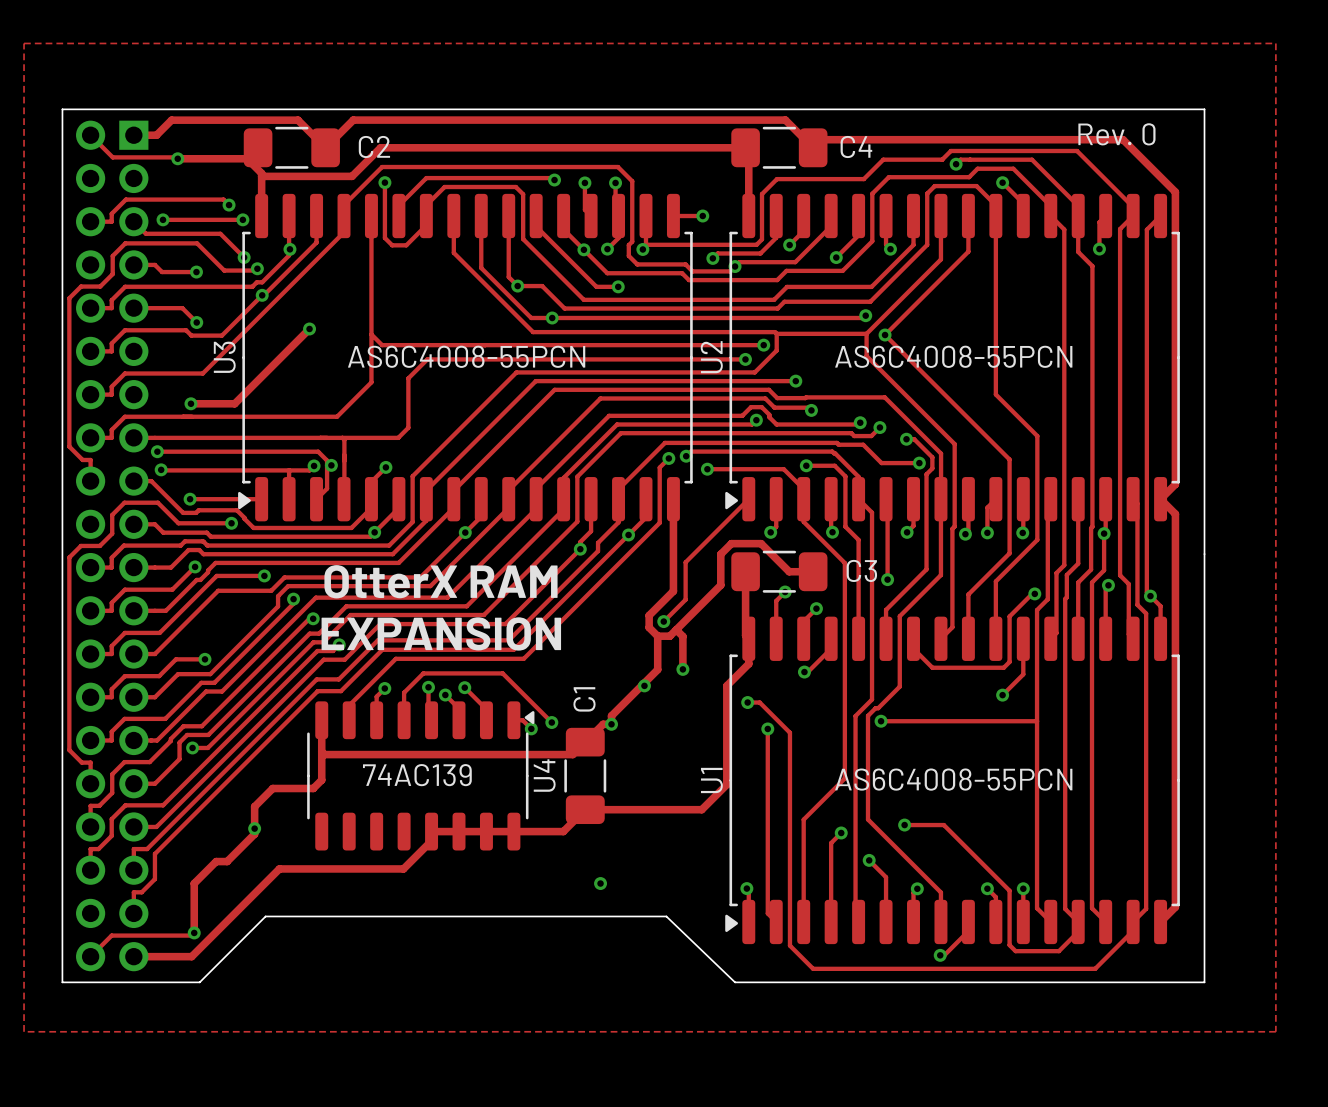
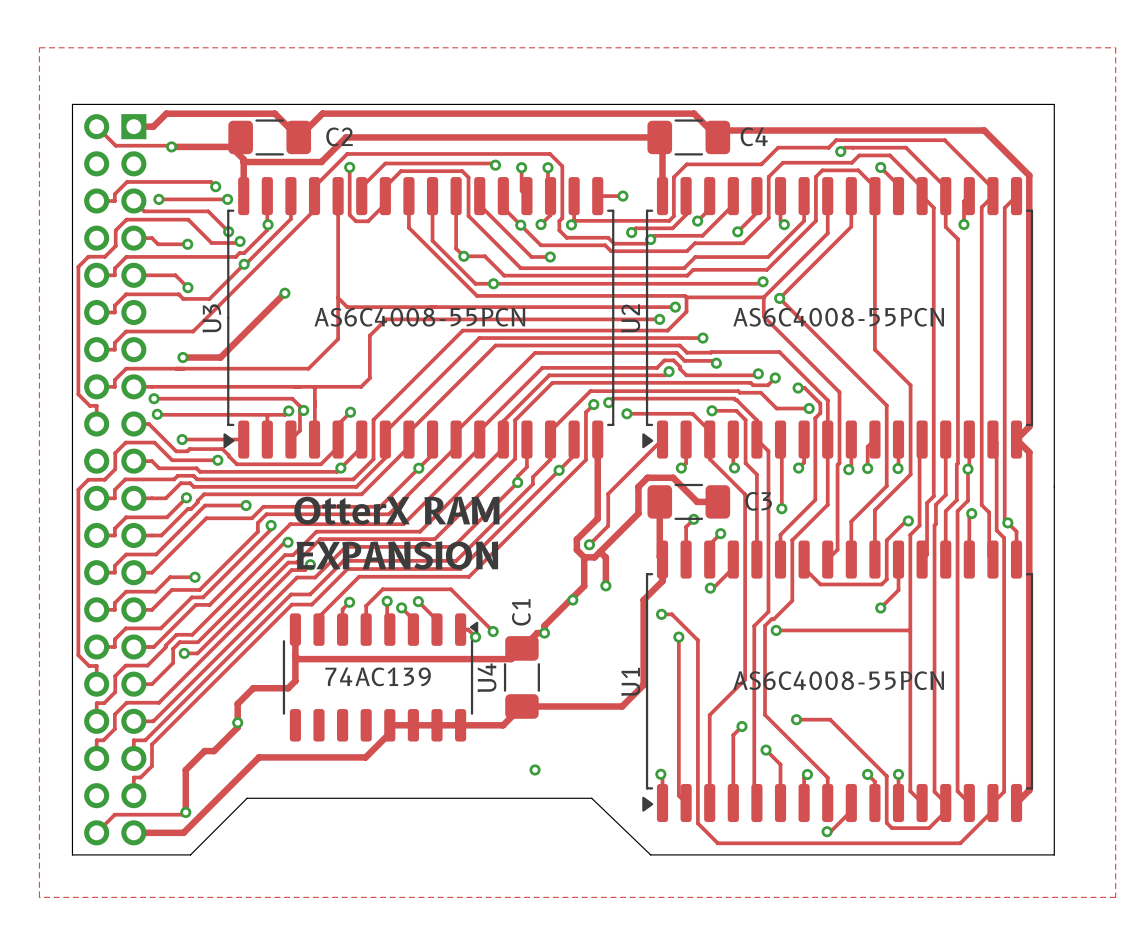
text: Rev. 0 (1116, 134) -> none

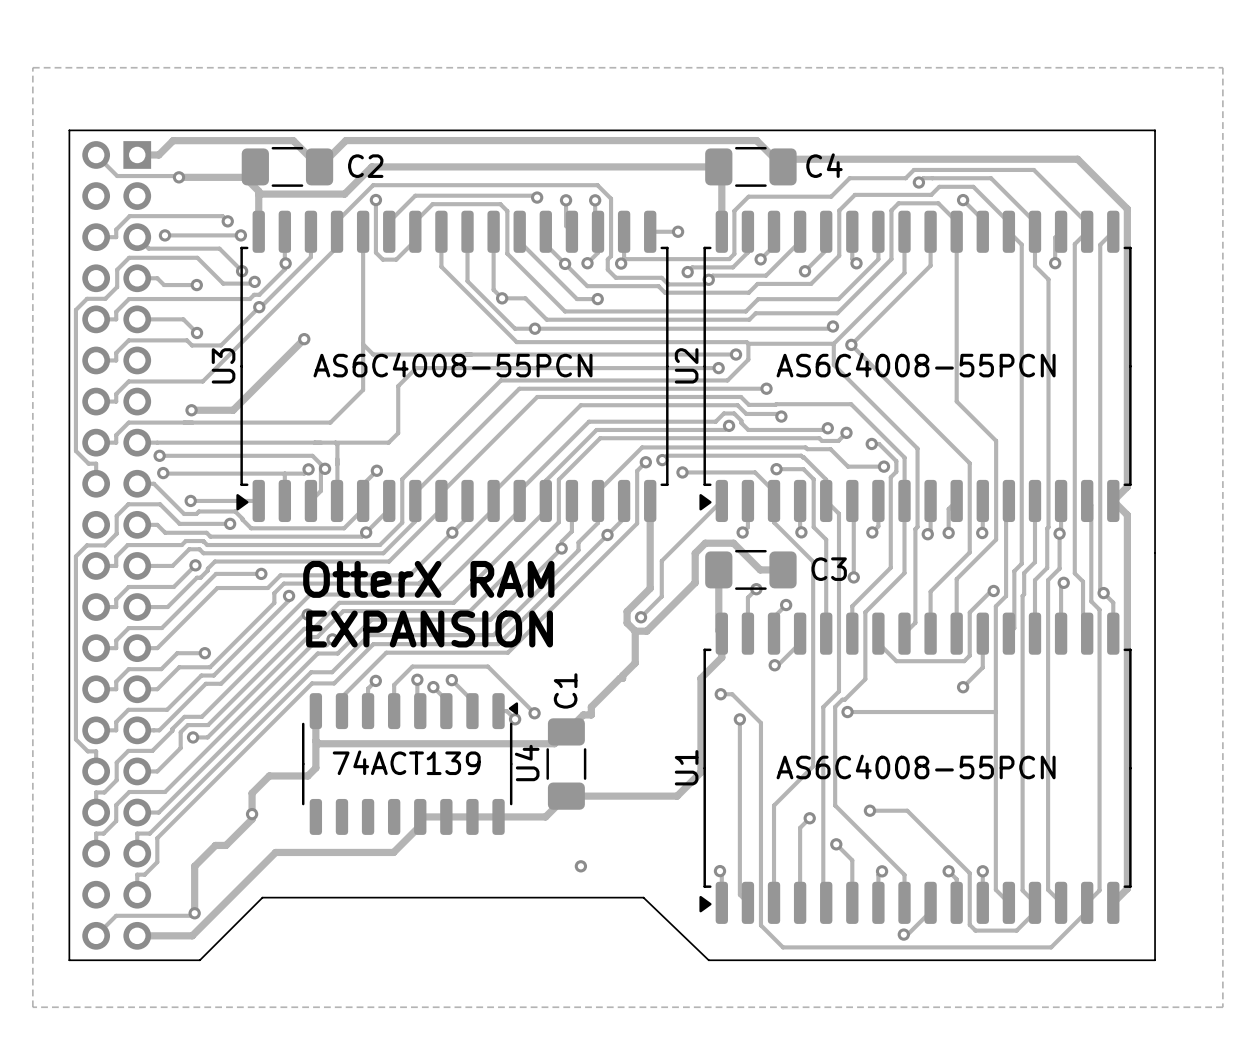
track: (600, 551) (605, 557) (605, 585) -> none
via: (605, 585) -> none
via: (572, 600) -> none
via: (544, 633) -> none
U4 value: 74AC139 (378, 676) -> 74ACT139 (406, 762)

